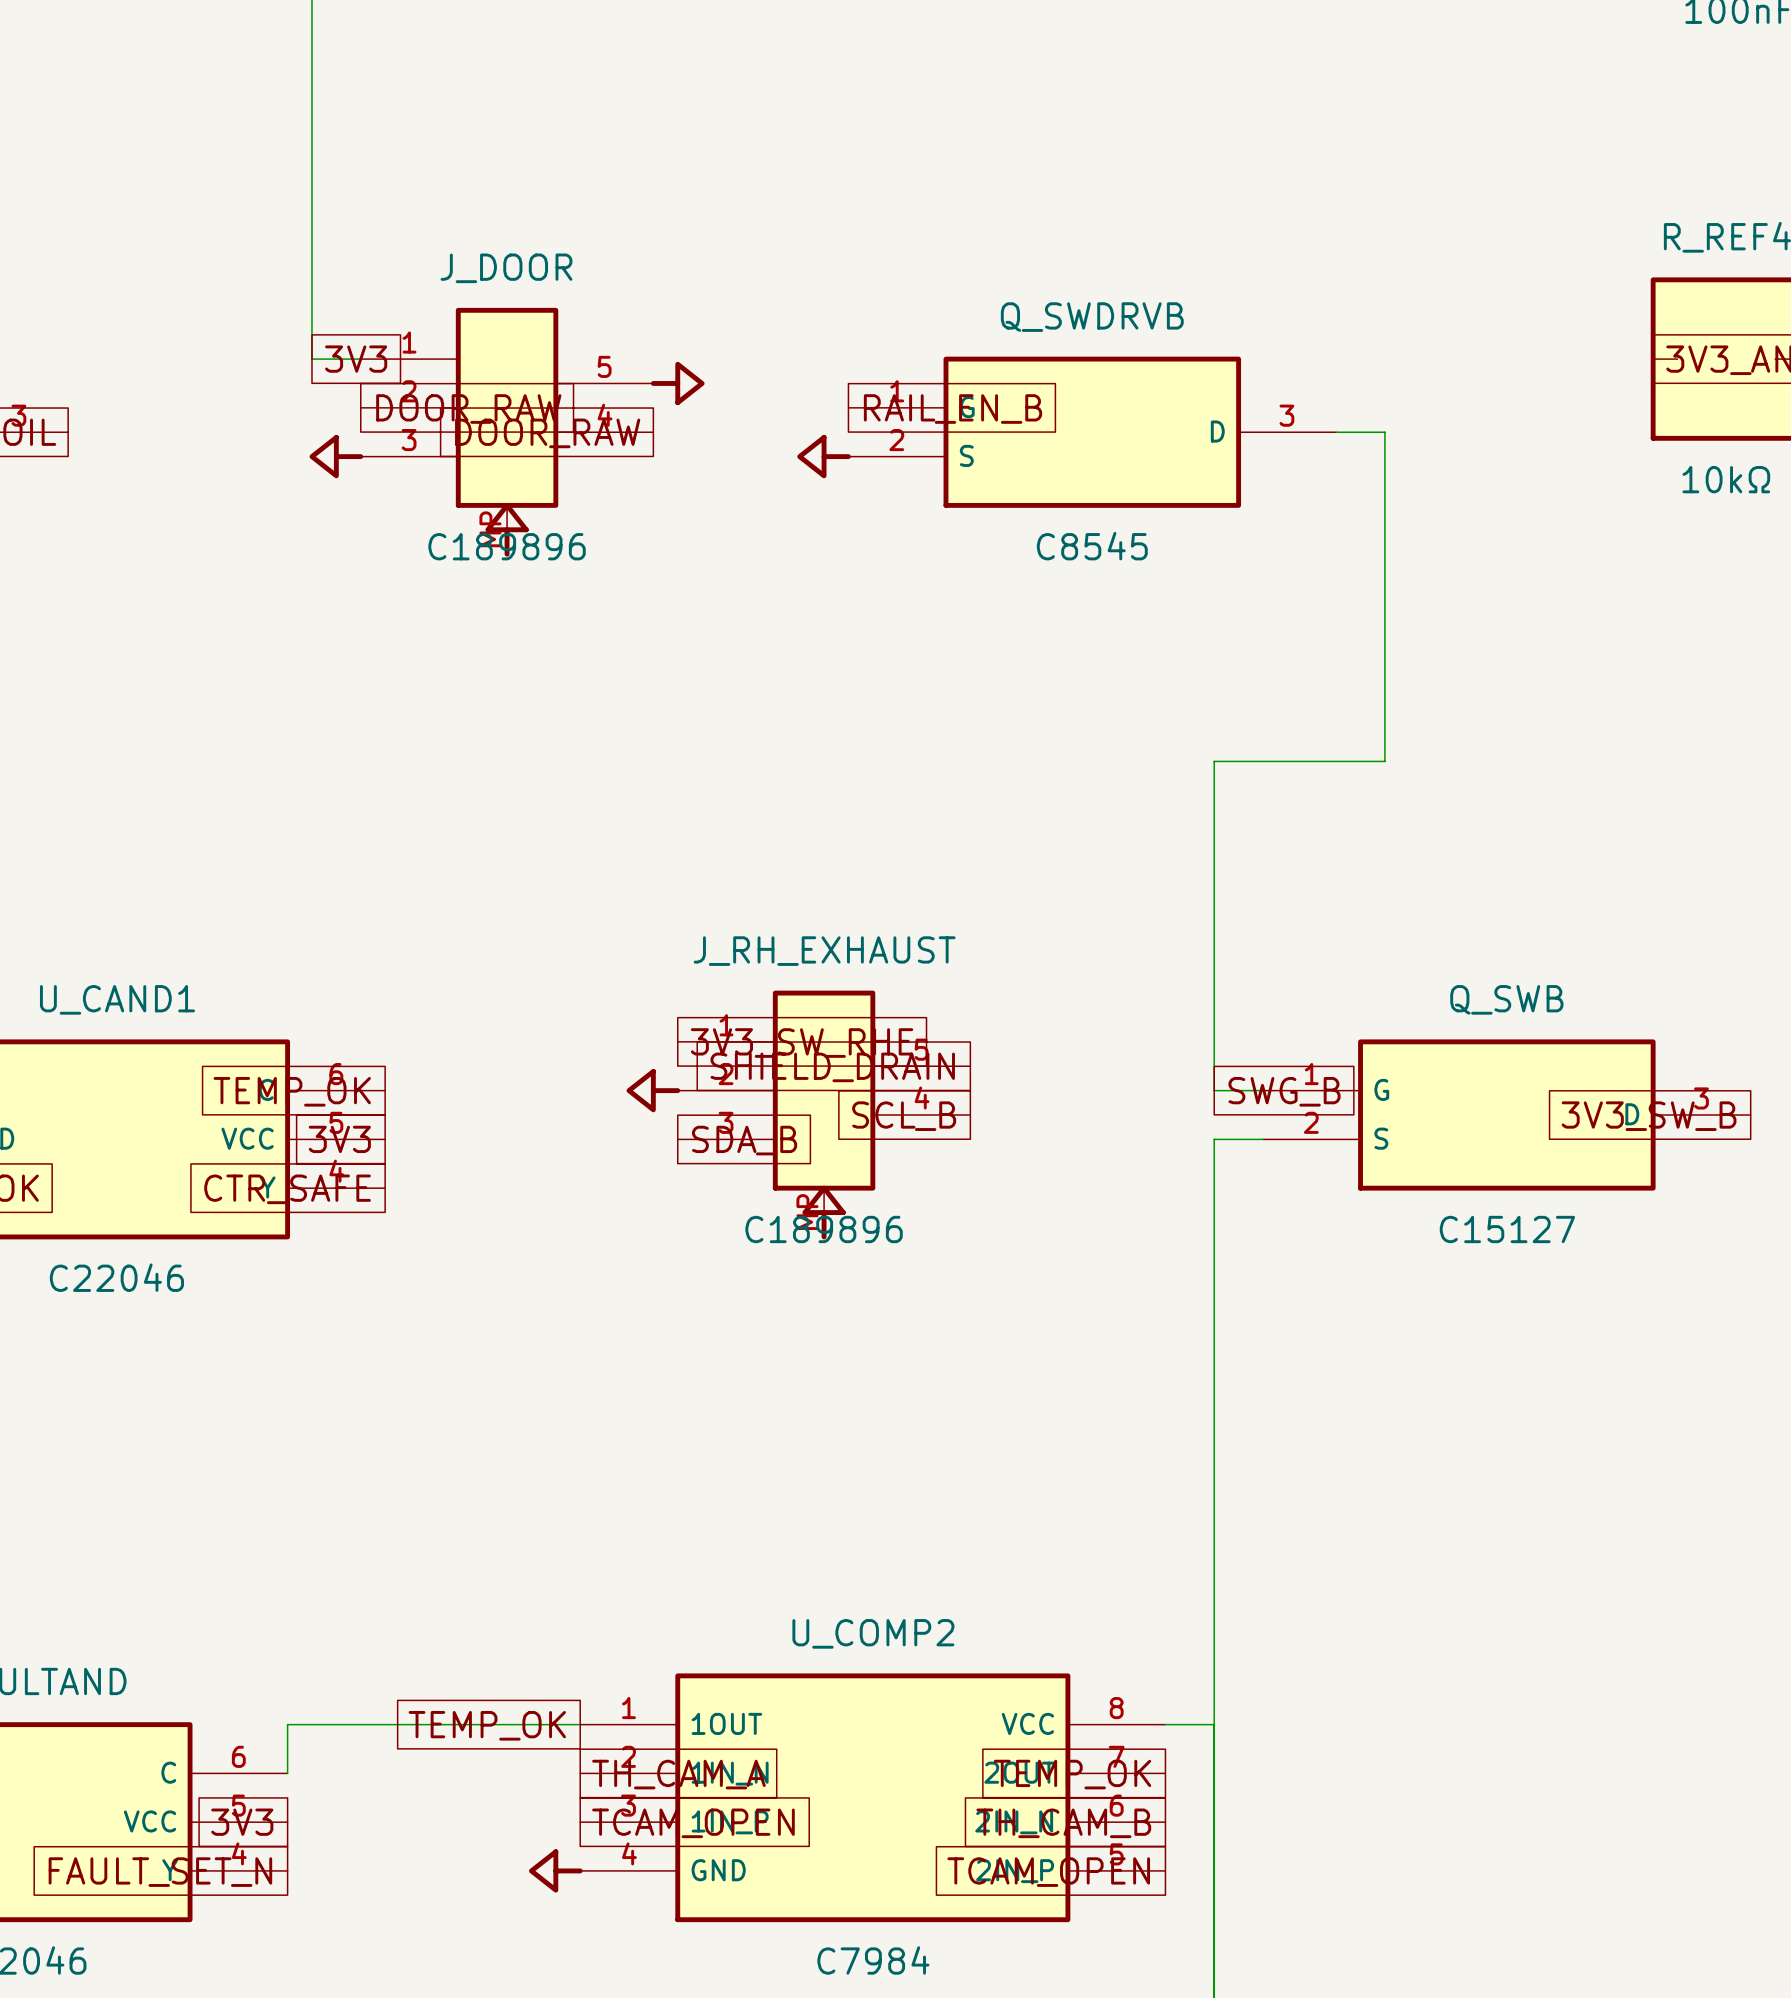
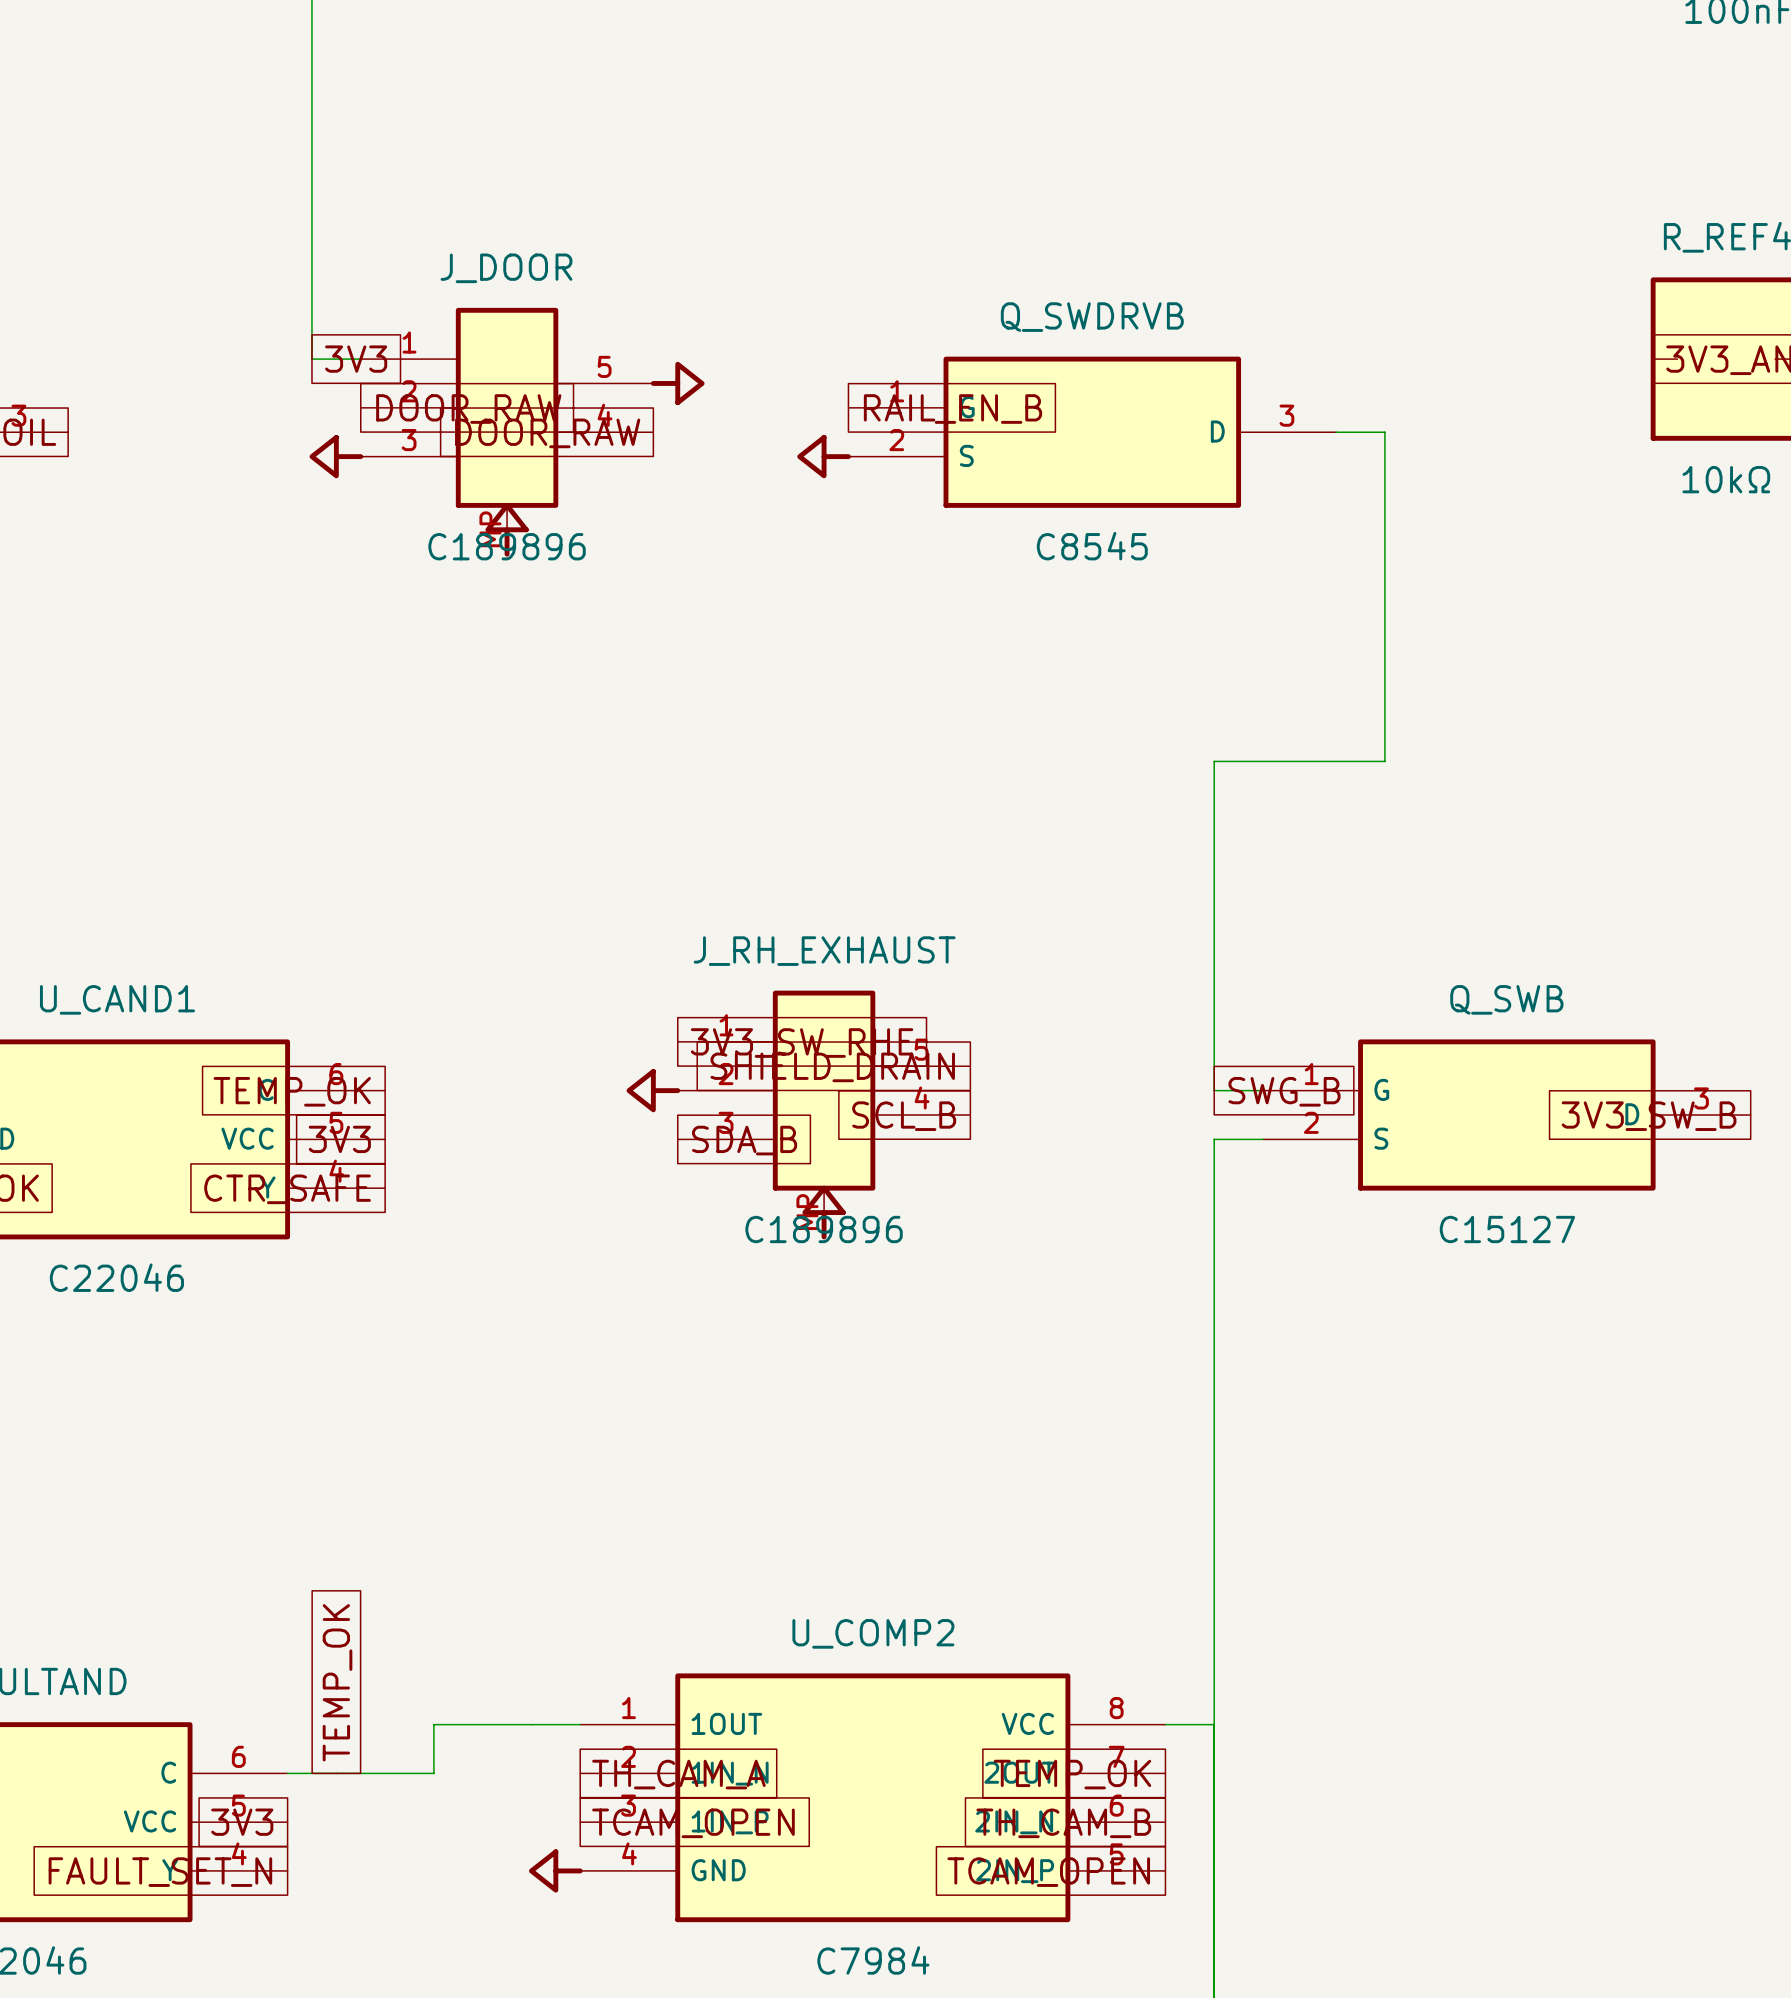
wire: (433, 1724) (287, 1724) (287, 1773) -> (433, 1724) (433, 1773) (287, 1773)
global label rotation: 0° (487, 1725) -> 90° clockwise (337, 1682)

